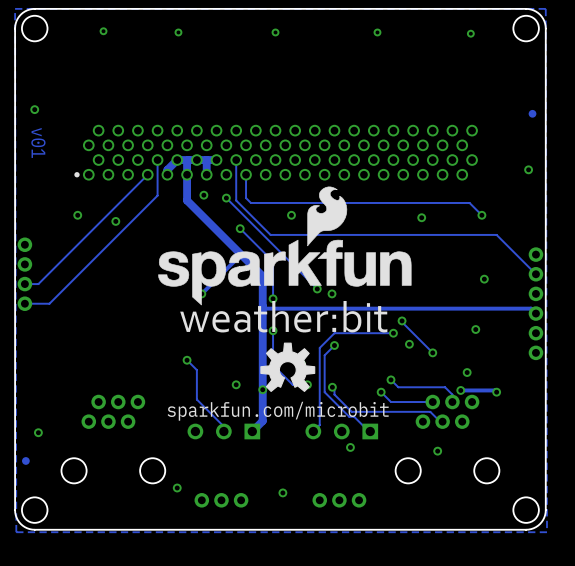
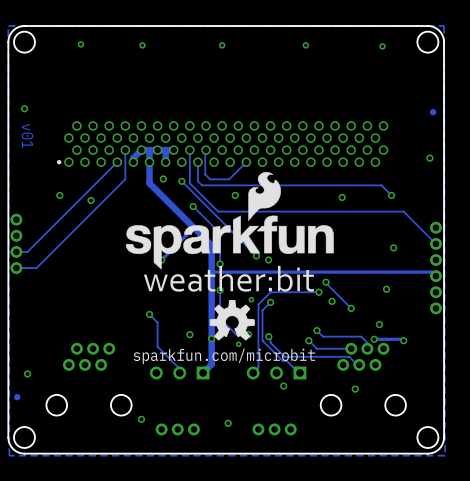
track: none -> (206, 150) (205, 174) (210, 179) (229, 179) (246, 162)
via: none -> (251, 299)
via: none -> (238, 344)

